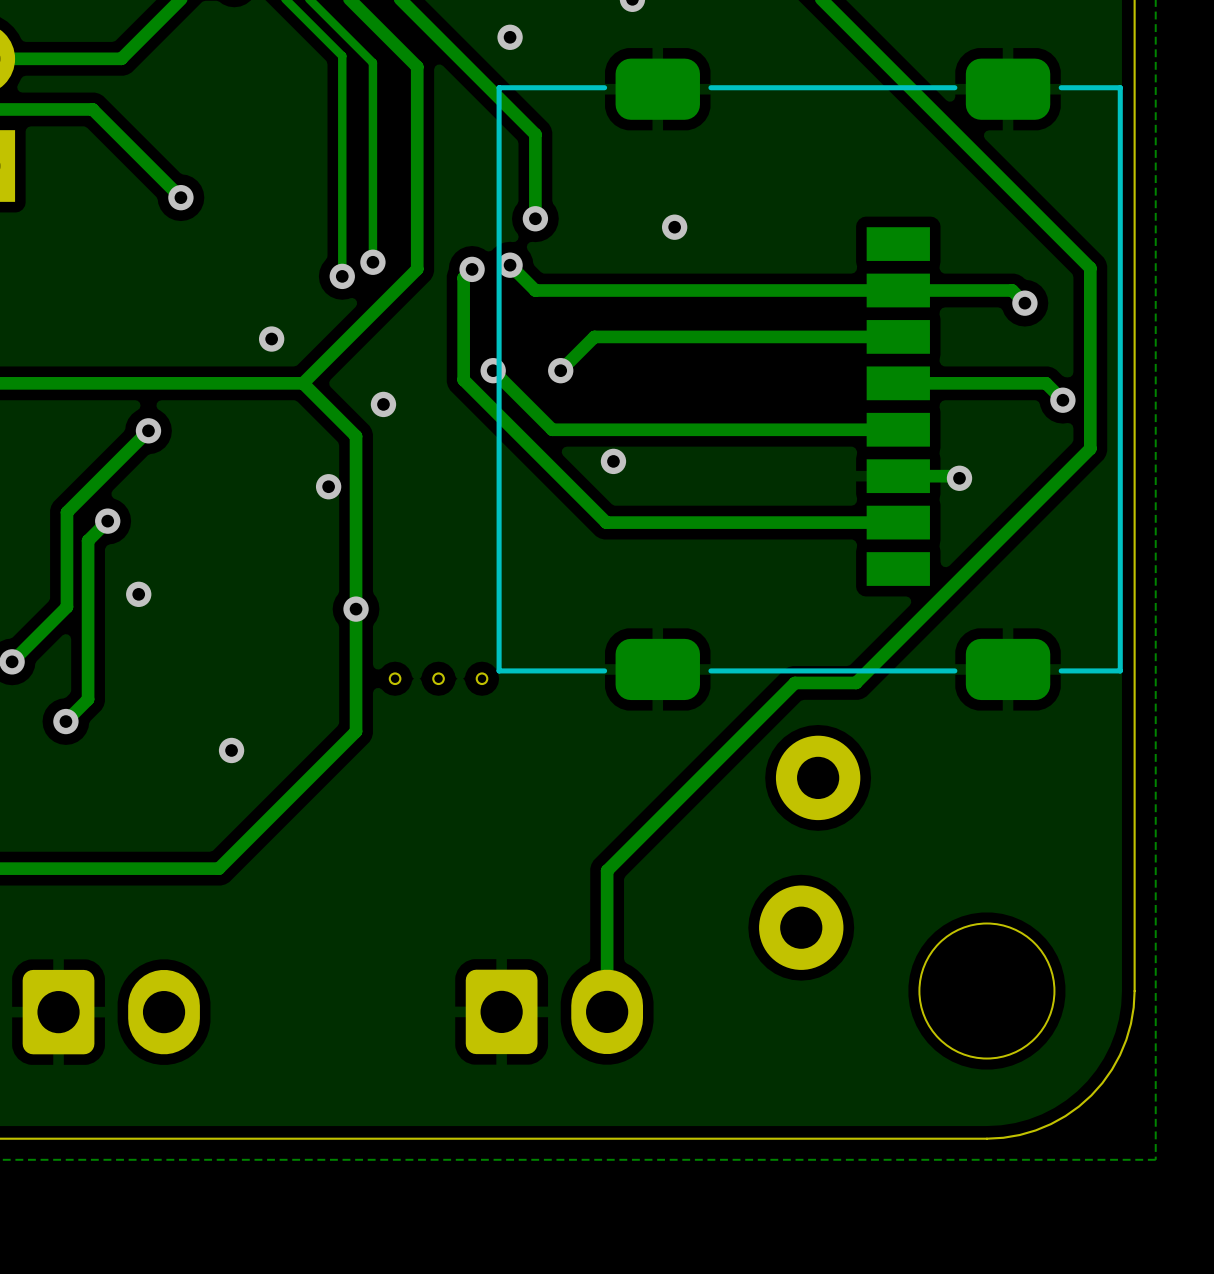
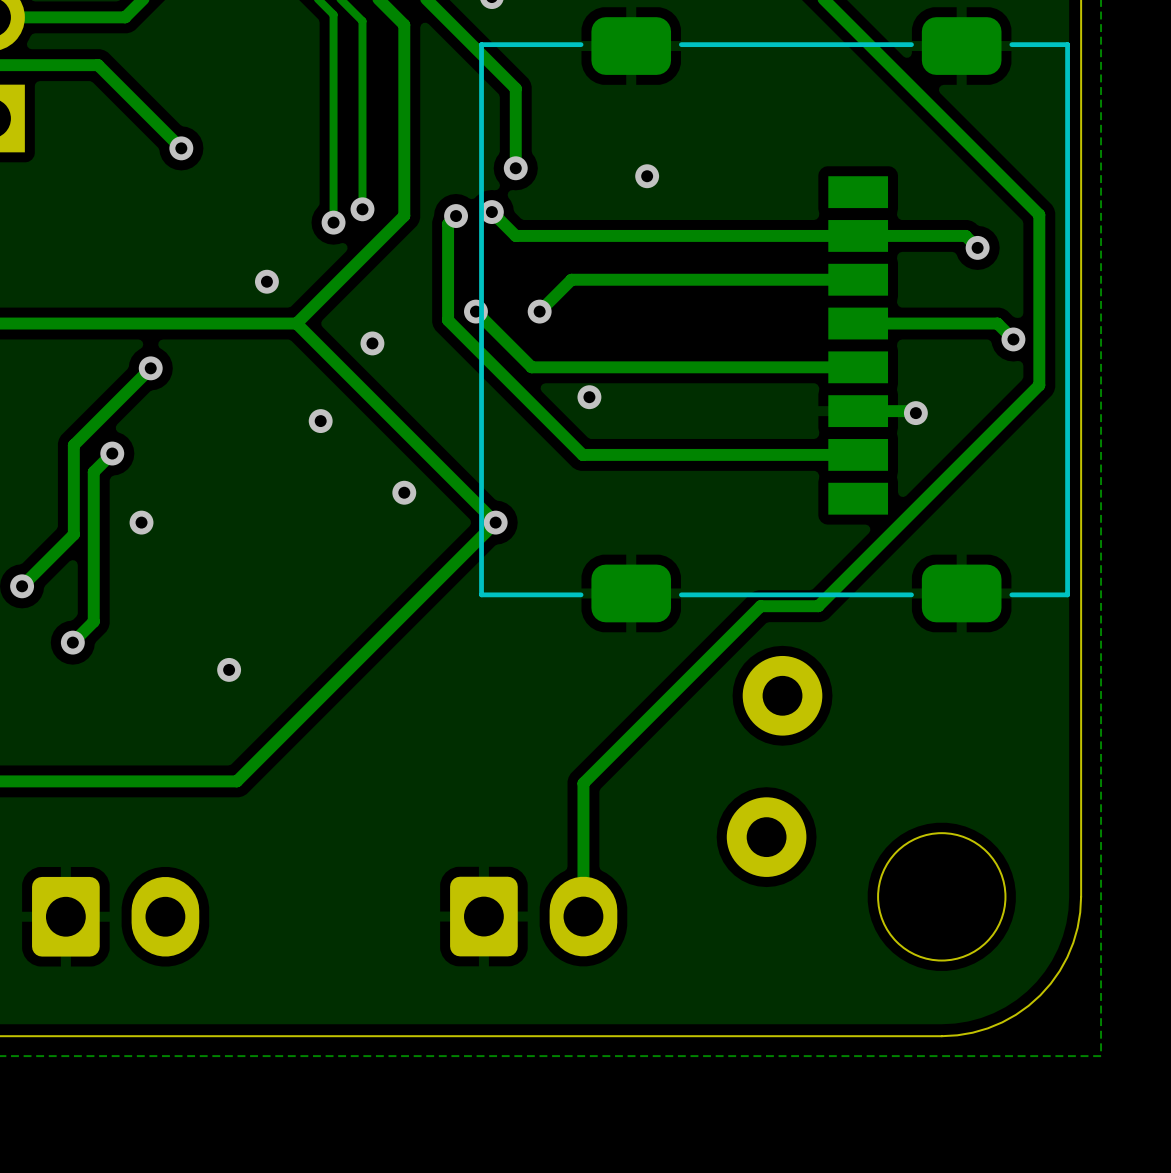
track: (356, 436) (356, 731) (218, 868) -> (346, 373) (495, 522) (236, 781) (217, 781)
via: none -> (495, 522)
via position: (356, 609) -> (404, 492)
part: (438, 678) -> none

